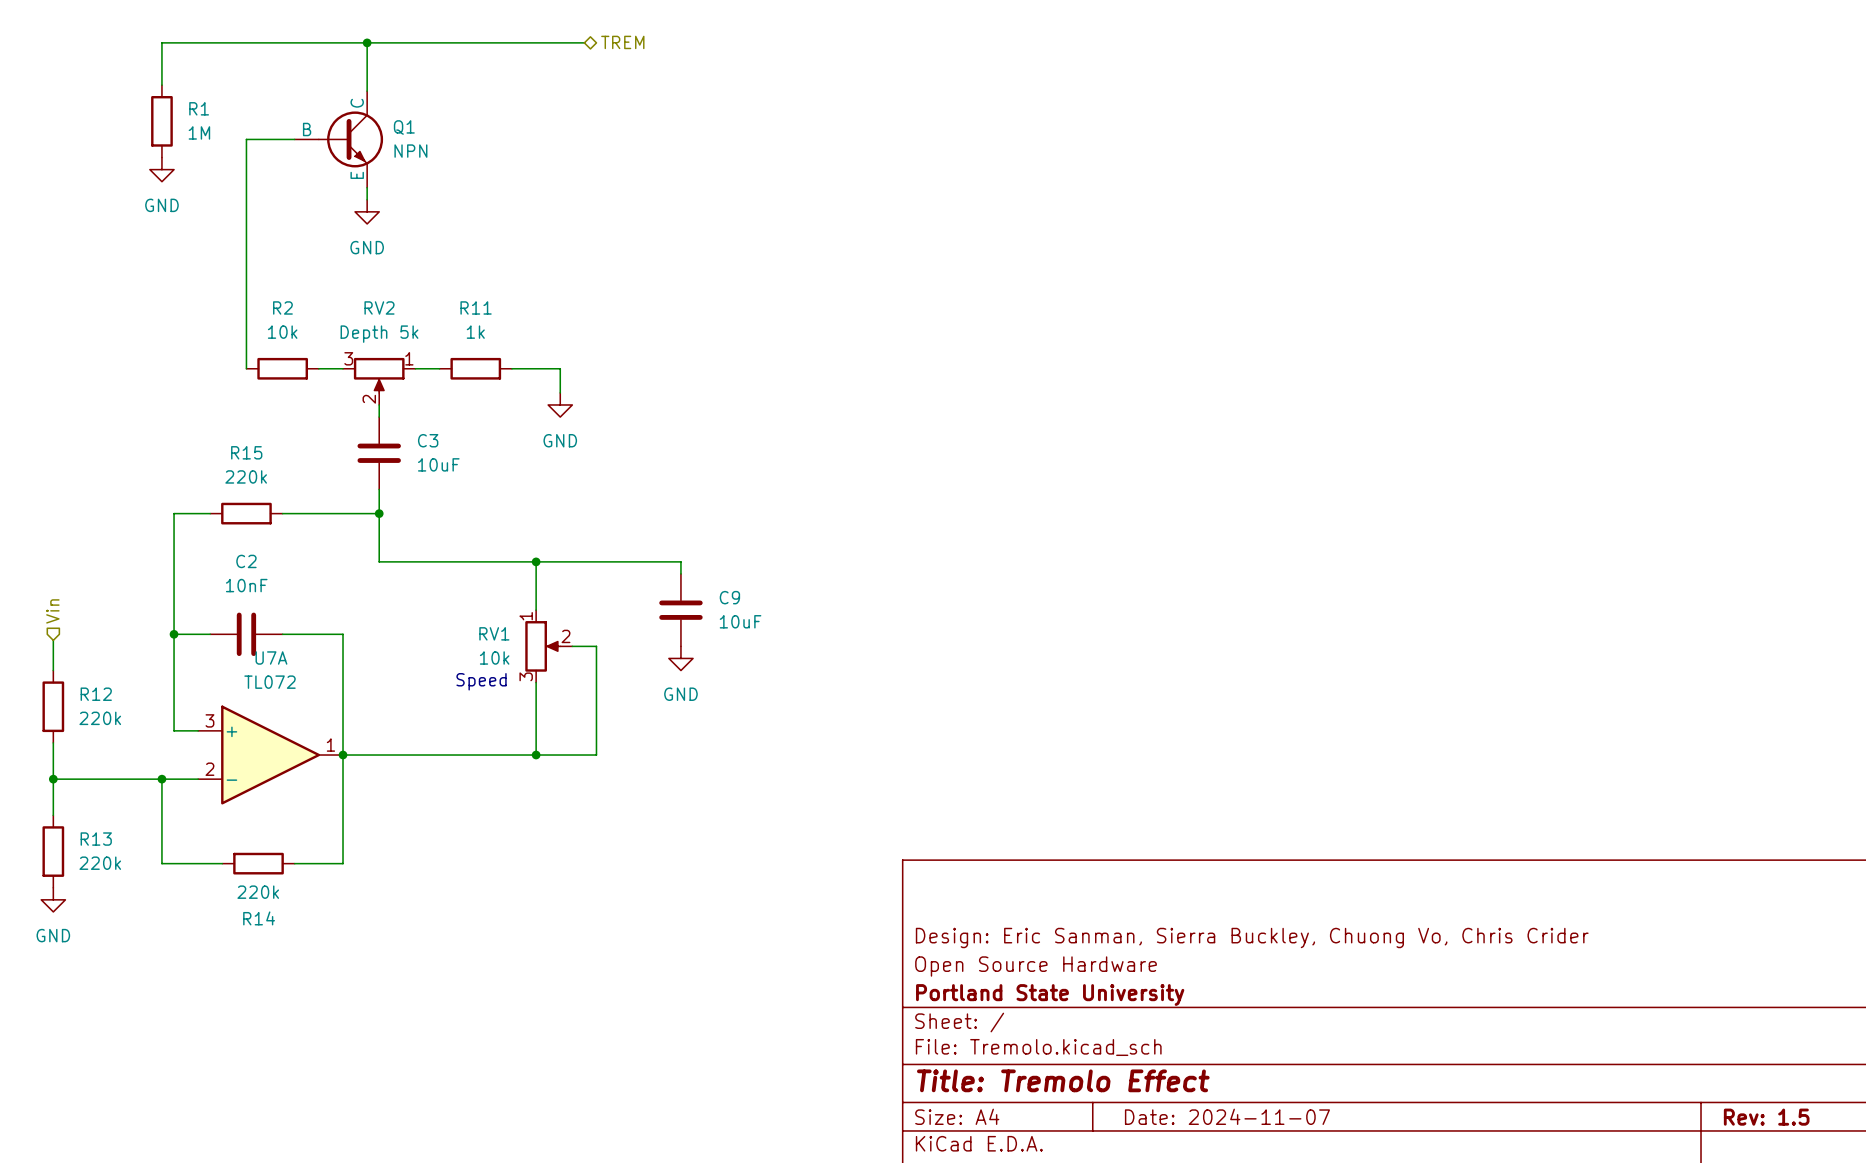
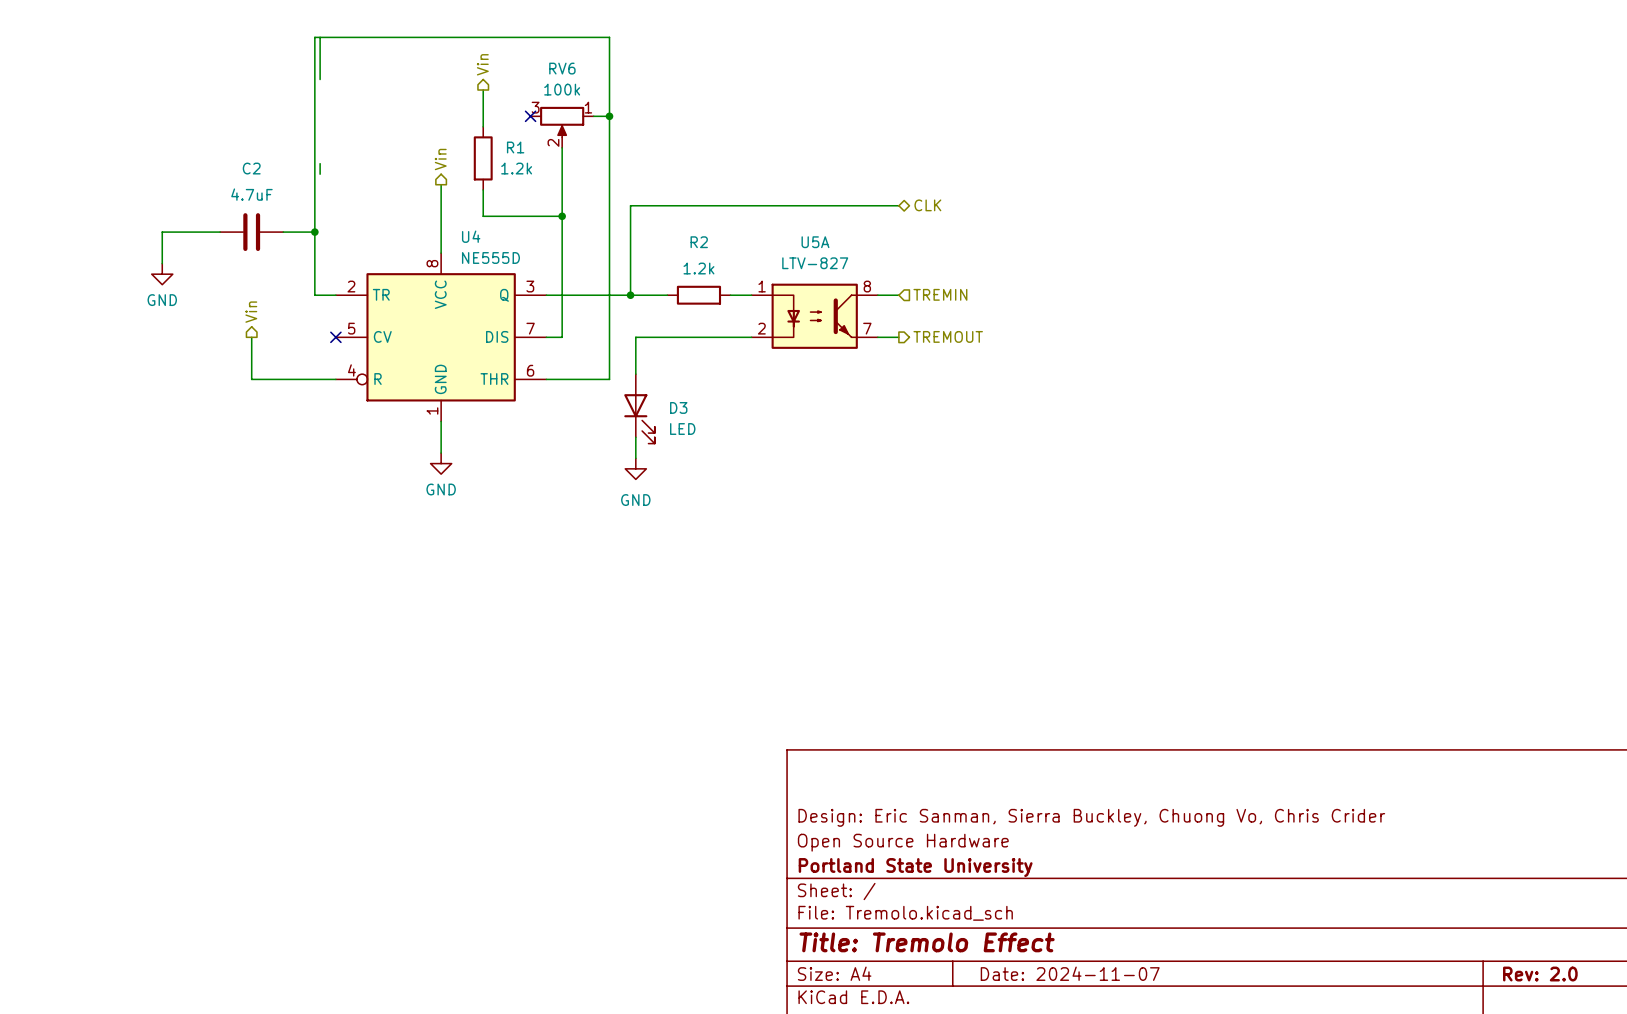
wire: (361, 42) (161, 42) (161, 85) -> (314, 37) (314, 295) (335, 295)
junction: (367, 42) -> none
wire: none -> (509, 37) (609, 37) (609, 379) (546, 379)
hierarchical label: TREM (622, 42) -> none
hierarchical label: none -> Vin (482, 64)
wire: none -> (483, 90) (483, 126)
R1 position: (161, 121) -> (483, 158)
R1 value: 1M (199, 132) -> 1.2k (516, 168)
no-connect mark: none -> (530, 116)
wire: none -> (593, 116) (609, 116)
junction: none -> (609, 116)
wire: (294, 139) (246, 139) (246, 368) -> none
Q1: NPN (338, 139) -> none
RV6: none -> 100k (562, 127)
power symbol: GND (161, 169) -> none
wire: none -> (562, 147) (562, 337) (546, 337)
hierarchical label: none -> Vin (440, 159)
power symbol: GND (367, 211) -> none
wire: none -> (441, 184) (441, 253)
wire: none -> (483, 189) (483, 216) (562, 216)
hierarchical label: none -> CLK (927, 205)
wire: none -> (898, 205) (630, 205) (630, 295)
junction: none -> (562, 216)
wire: none -> (220, 232) (162, 232) (162, 263)
wire: none -> (283, 232) (314, 232)
junction: none -> (314, 232)
power symbol: none -> GND (162, 274)
R2 value: 10k (282, 332) -> 1.2k (698, 268)
wire: none -> (546, 295) (667, 295)
junction: none -> (630, 295)
wire: none -> (730, 295) (751, 295)
wire: none -> (877, 295) (898, 295)
hierarchical label: none -> TREMIN (940, 294)
hierarchical label: none -> Vin (251, 312)
U5A: none -> LTV-827 (814, 316)
R2 position: (282, 368) -> (698, 295)
wire: (318, 368) (343, 368) -> none
R11: 1k (475, 368) -> none
RV2: Depth 5k (379, 381) -> none
wire: none -> (251, 337) (251, 379) (335, 379)
no-connect mark: none -> (335, 337)
U4: none -> NE555D (441, 337)
wire: none -> (751, 337) (635, 337) (635, 374)
wire: none -> (877, 337) (898, 337)
hierarchical label: none -> TREMOUT (948, 336)
wire: (379, 404) (379, 417) -> none
power symbol: GND (560, 404) -> none
C3: 10uF (379, 453) -> none
D3: none -> LED (639, 408)
wire: none -> (441, 421) (441, 453)
wire: (379, 489) (379, 561) (680, 561) (680, 573) -> none
wire: none -> (635, 437) (635, 458)
wire: (210, 513) (174, 513) (174, 730) (198, 730) -> none
R15: 220k (246, 513) -> none
wire: (282, 513) (379, 513) -> none
junction: (379, 513) -> none
power symbol: none -> GND (441, 463)
power symbol: none -> GND (635, 468)
wire: (536, 561) (536, 610) -> none
junction: (536, 561) -> none
C2 value: 10nF (246, 585) -> 4.7uF (251, 194)
C9: 10uF (680, 610) -> none
hierarchical label: Vin (52, 611) -> none
wire: (174, 634) (210, 634) -> none
junction: (174, 634) -> none
C2 position: (246, 634) -> (251, 232)
wire: (282, 634) (343, 634) (343, 863) (294, 863) -> none
wire: (53, 640) (53, 670) -> none
RV1: 10k (548, 646) -> none
wire: (572, 646) (596, 646) (596, 755) (343, 755) -> none
power symbol: GND (680, 658) -> none
text: Speed (481, 681) -> none
wire: (536, 682) (536, 755) -> none
R12: 220k (53, 706) -> none
wire: (53, 742) (53, 815) -> none
U7A: TL072 (270, 755) -> none
junction: (343, 755) -> none
junction: (536, 755) -> none
wire: (53, 779) (198, 779) -> none
junction: (53, 779) -> none
wire: (161, 779) (161, 863) (222, 863) -> none
junction: (161, 779) -> none
R13: 220k (53, 851) -> none
R14: 220k (258, 863) -> none
power symbol: GND (53, 899) -> none
title block: Rev: 1.5 (1766, 1117) -> Rev: 2.0 (1540, 974)

